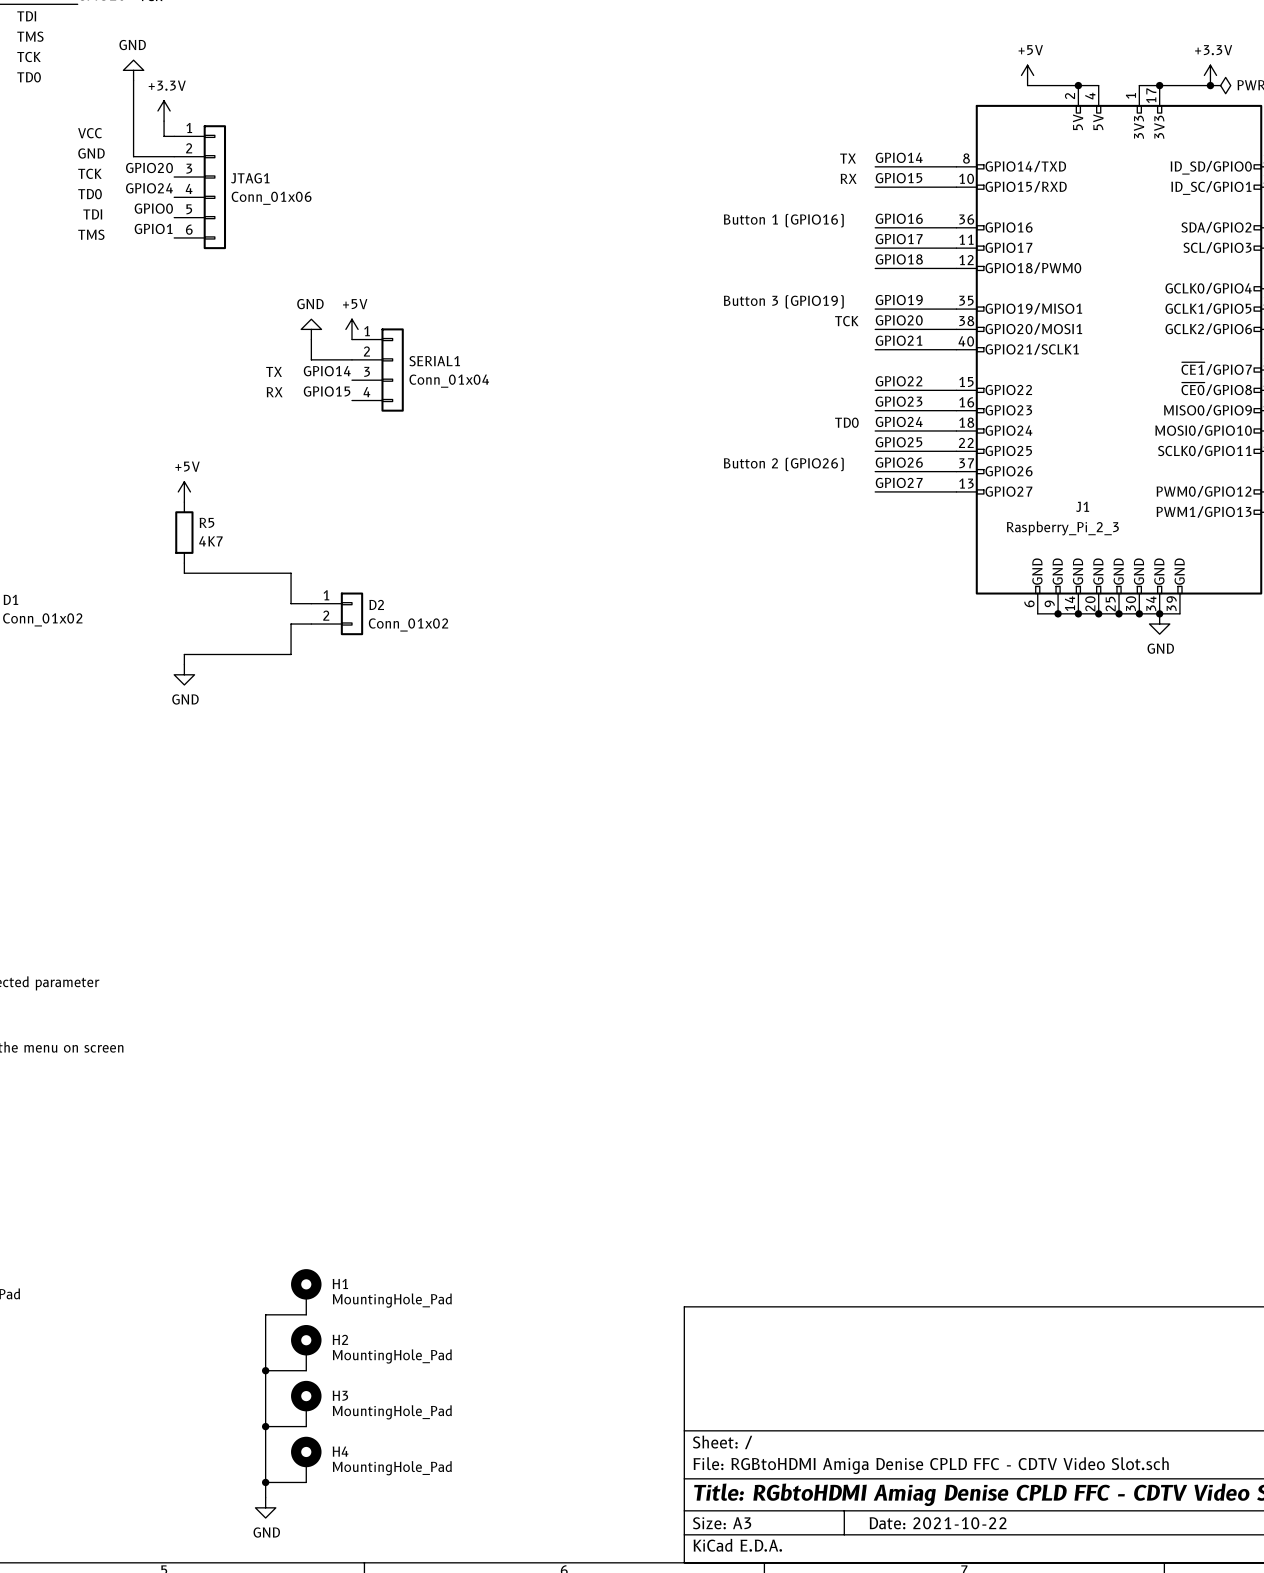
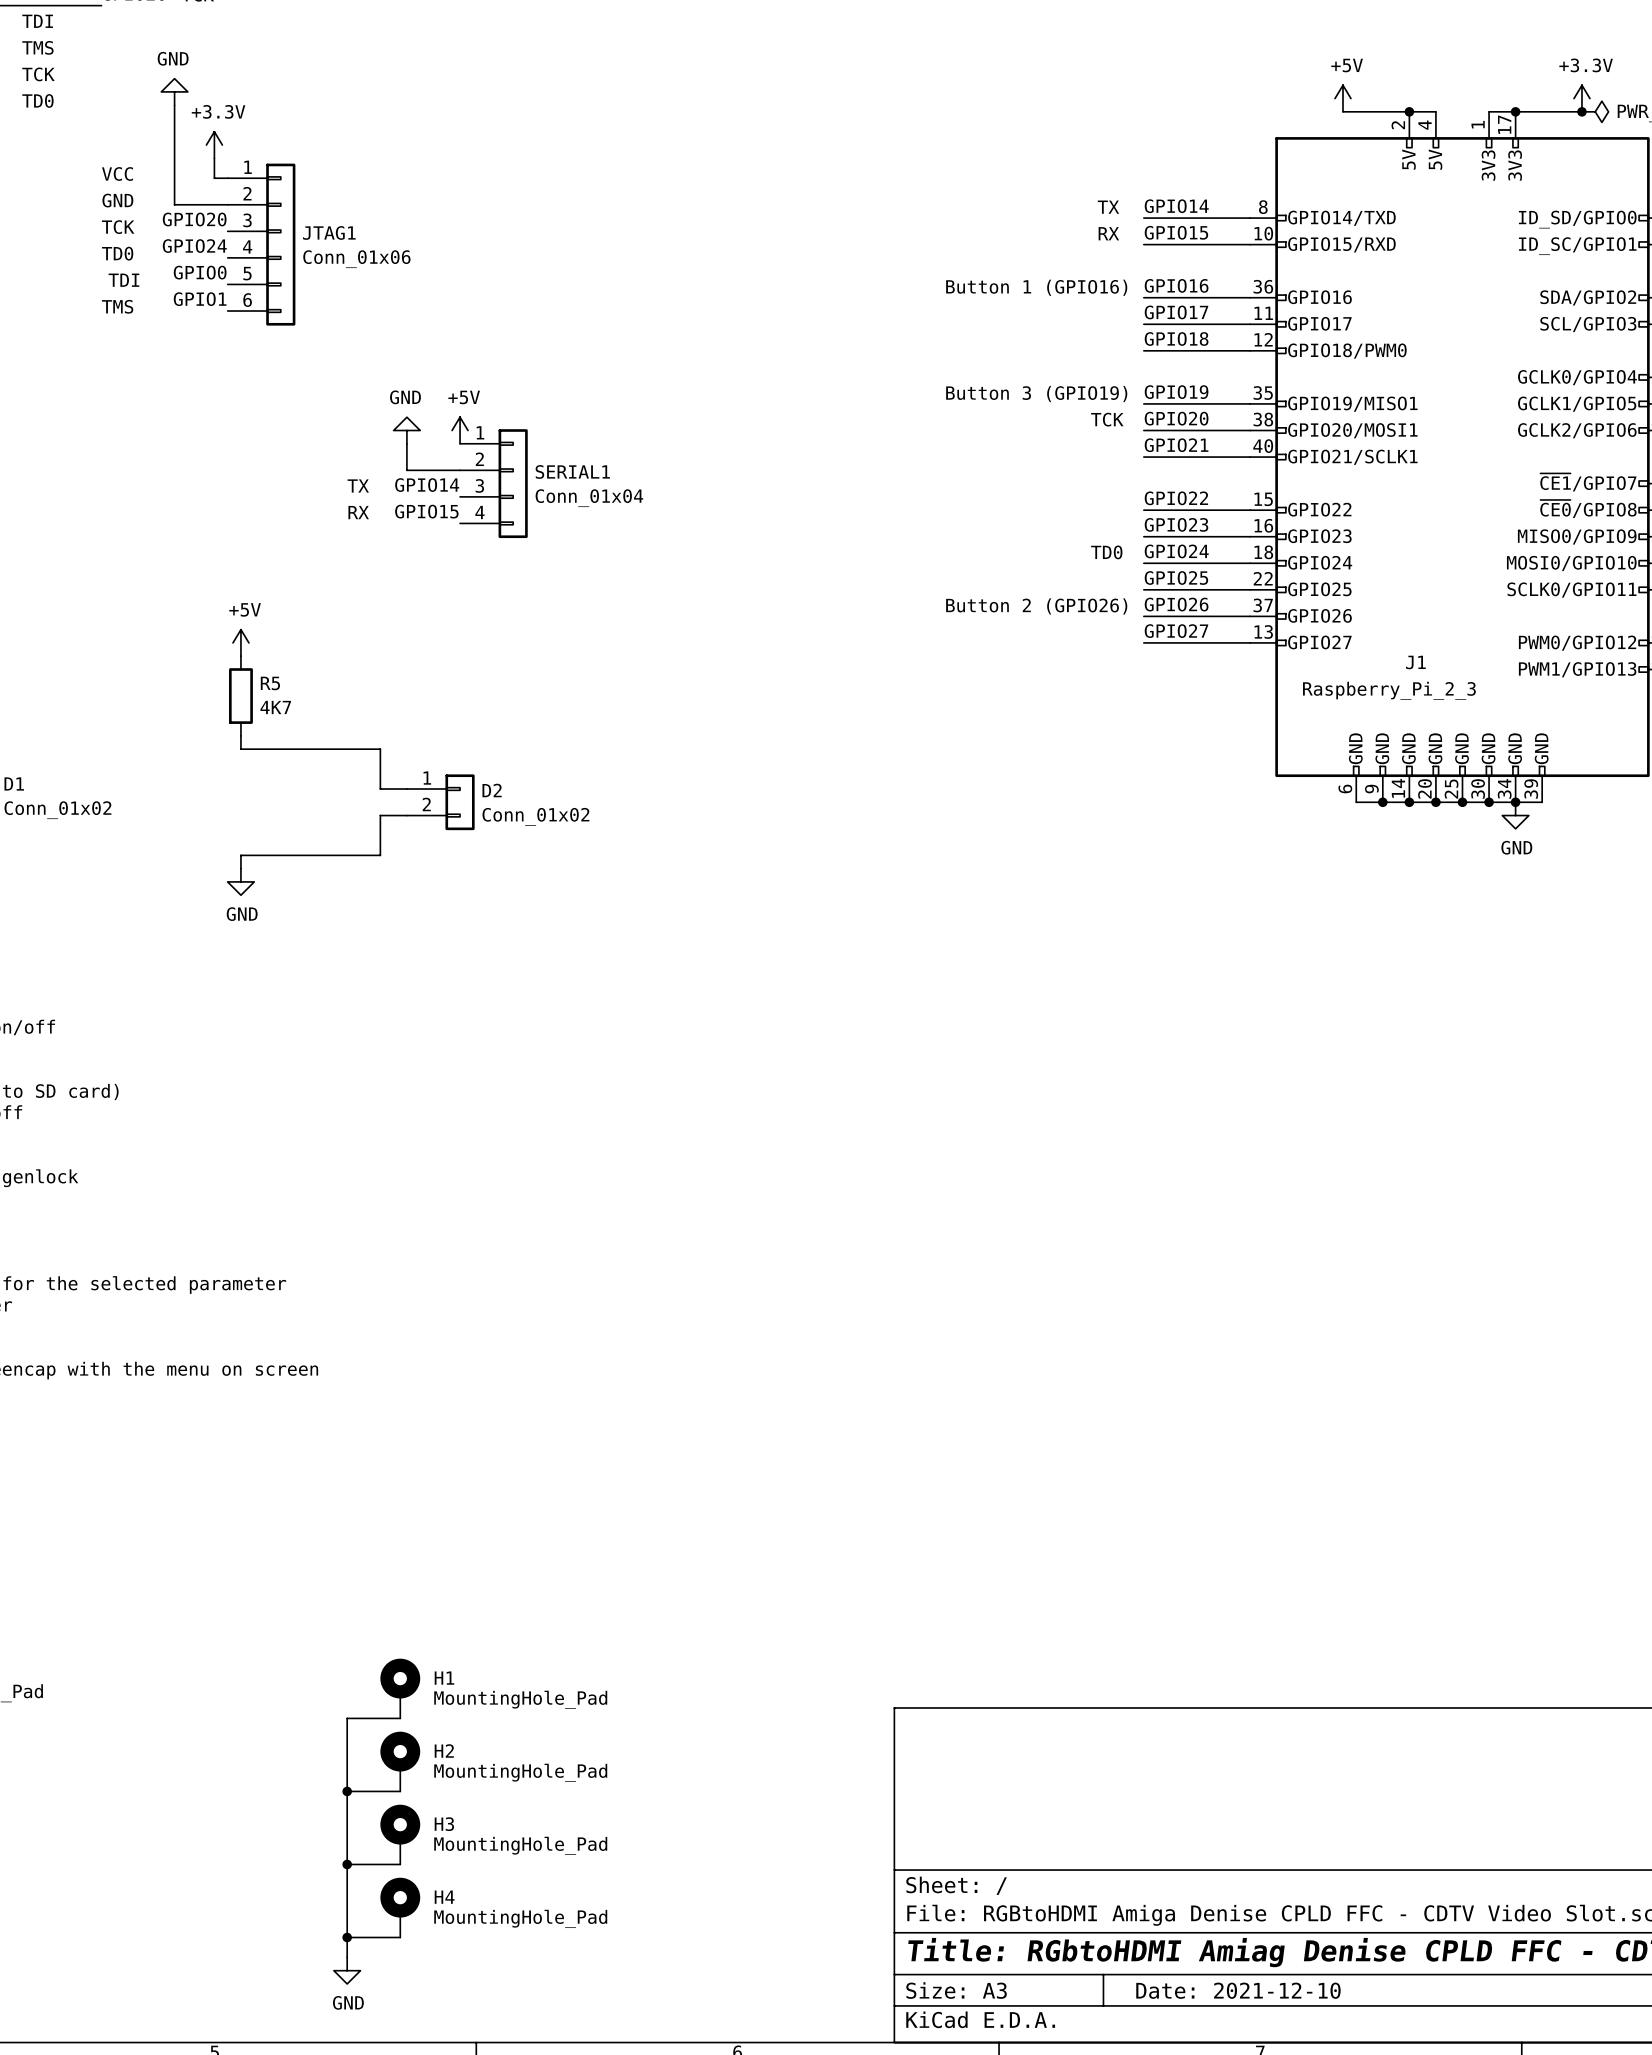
title block: Date: 2021-10-22 (938, 1523) -> Date: 2021-12-10 (1238, 1990)

